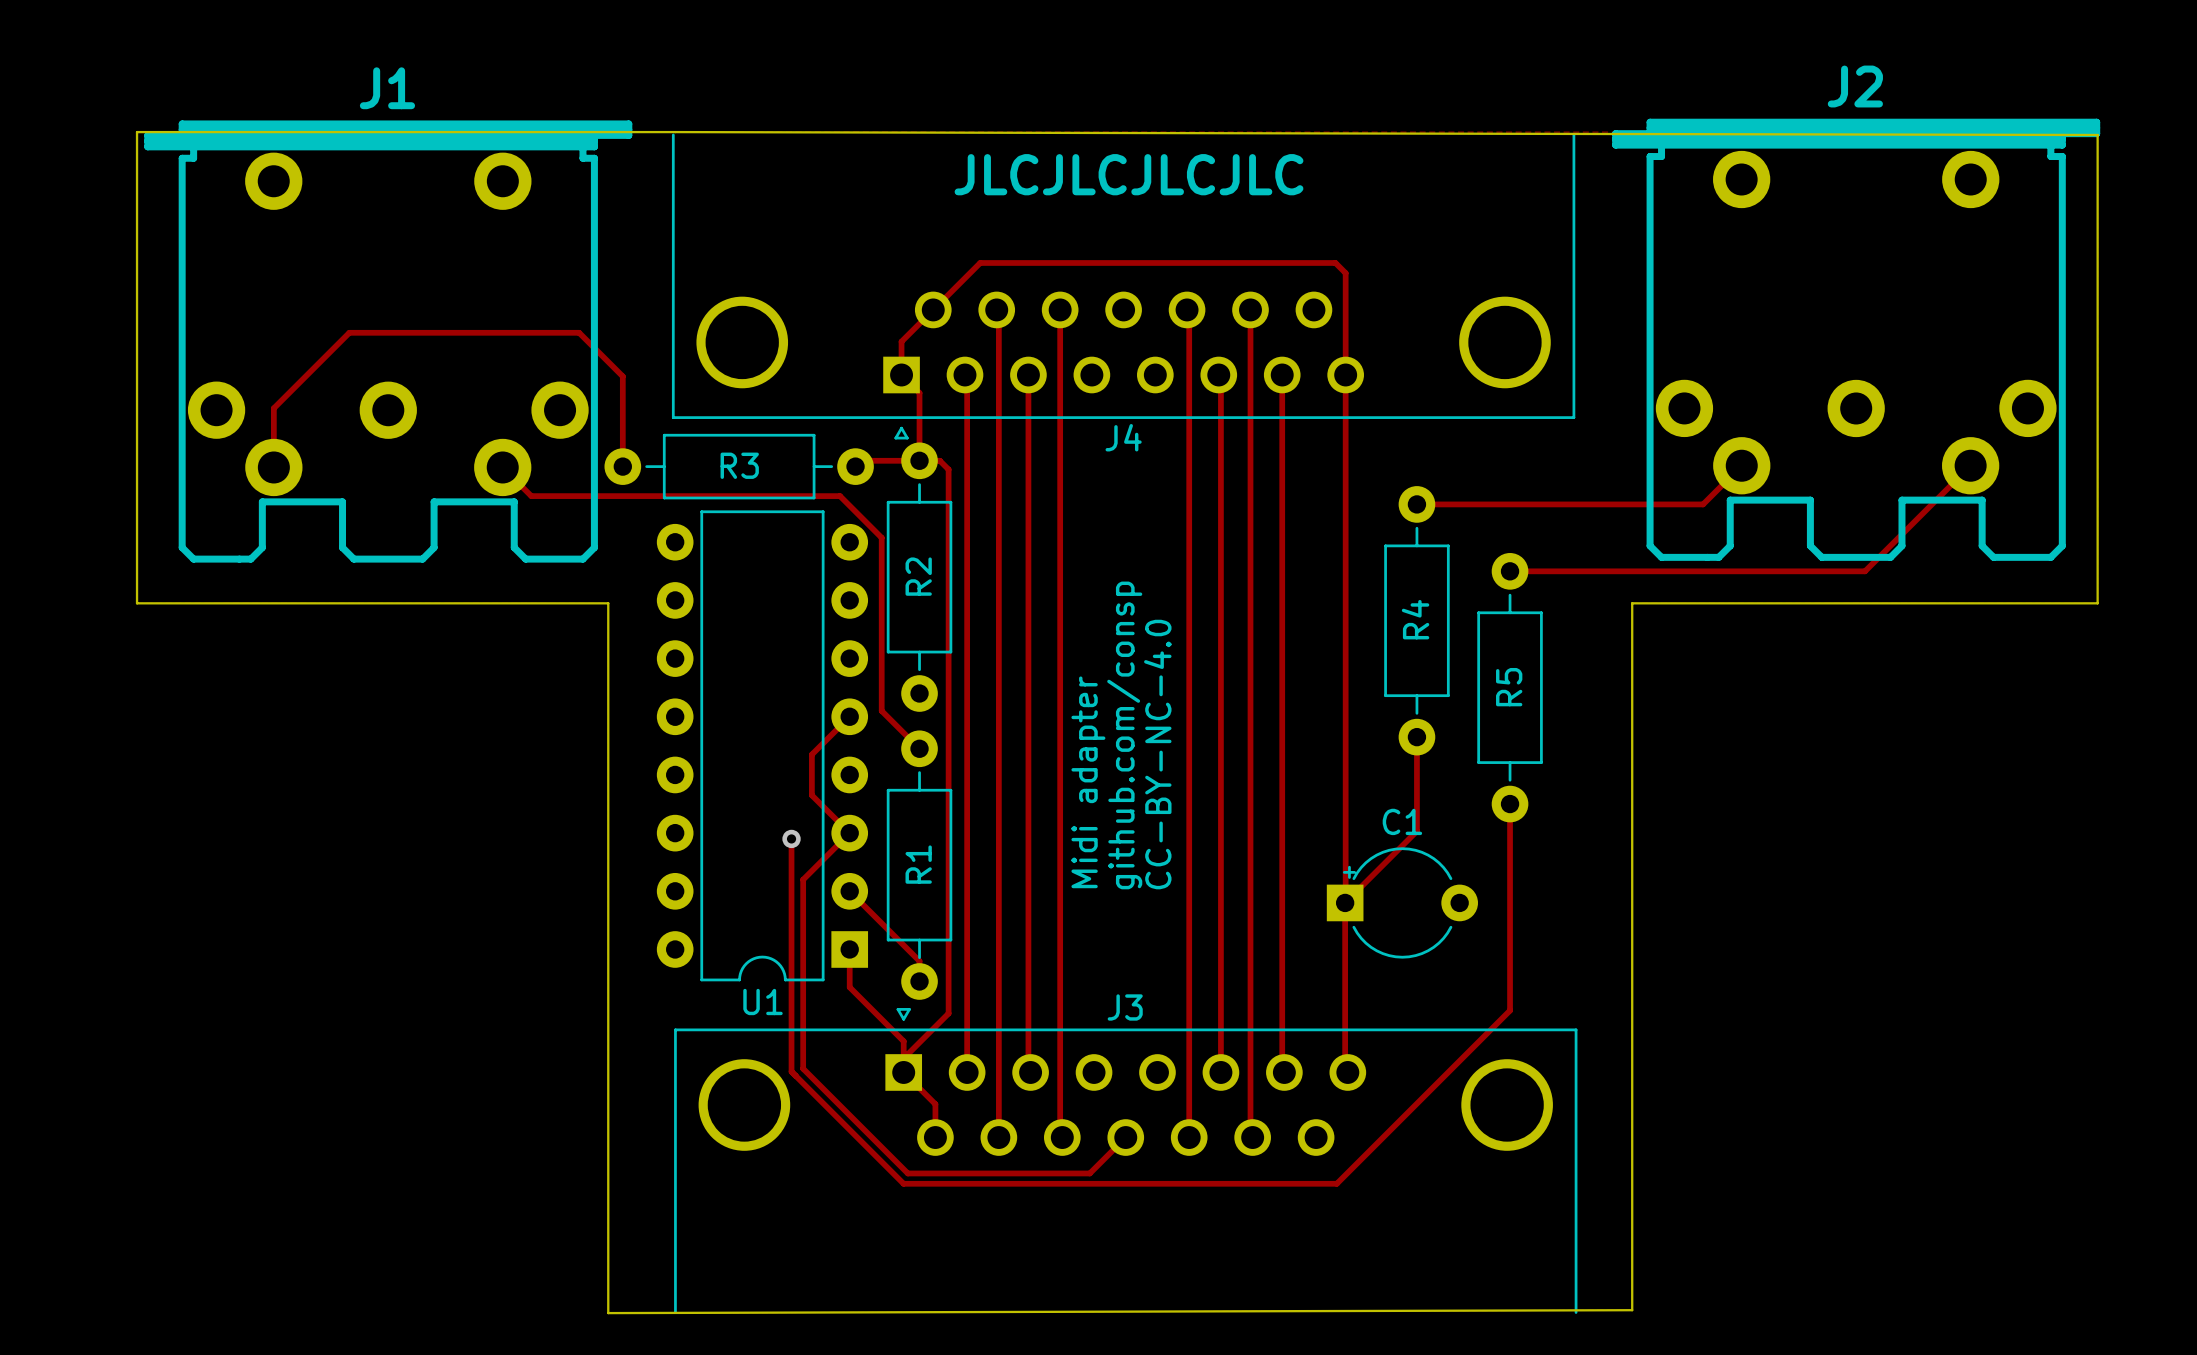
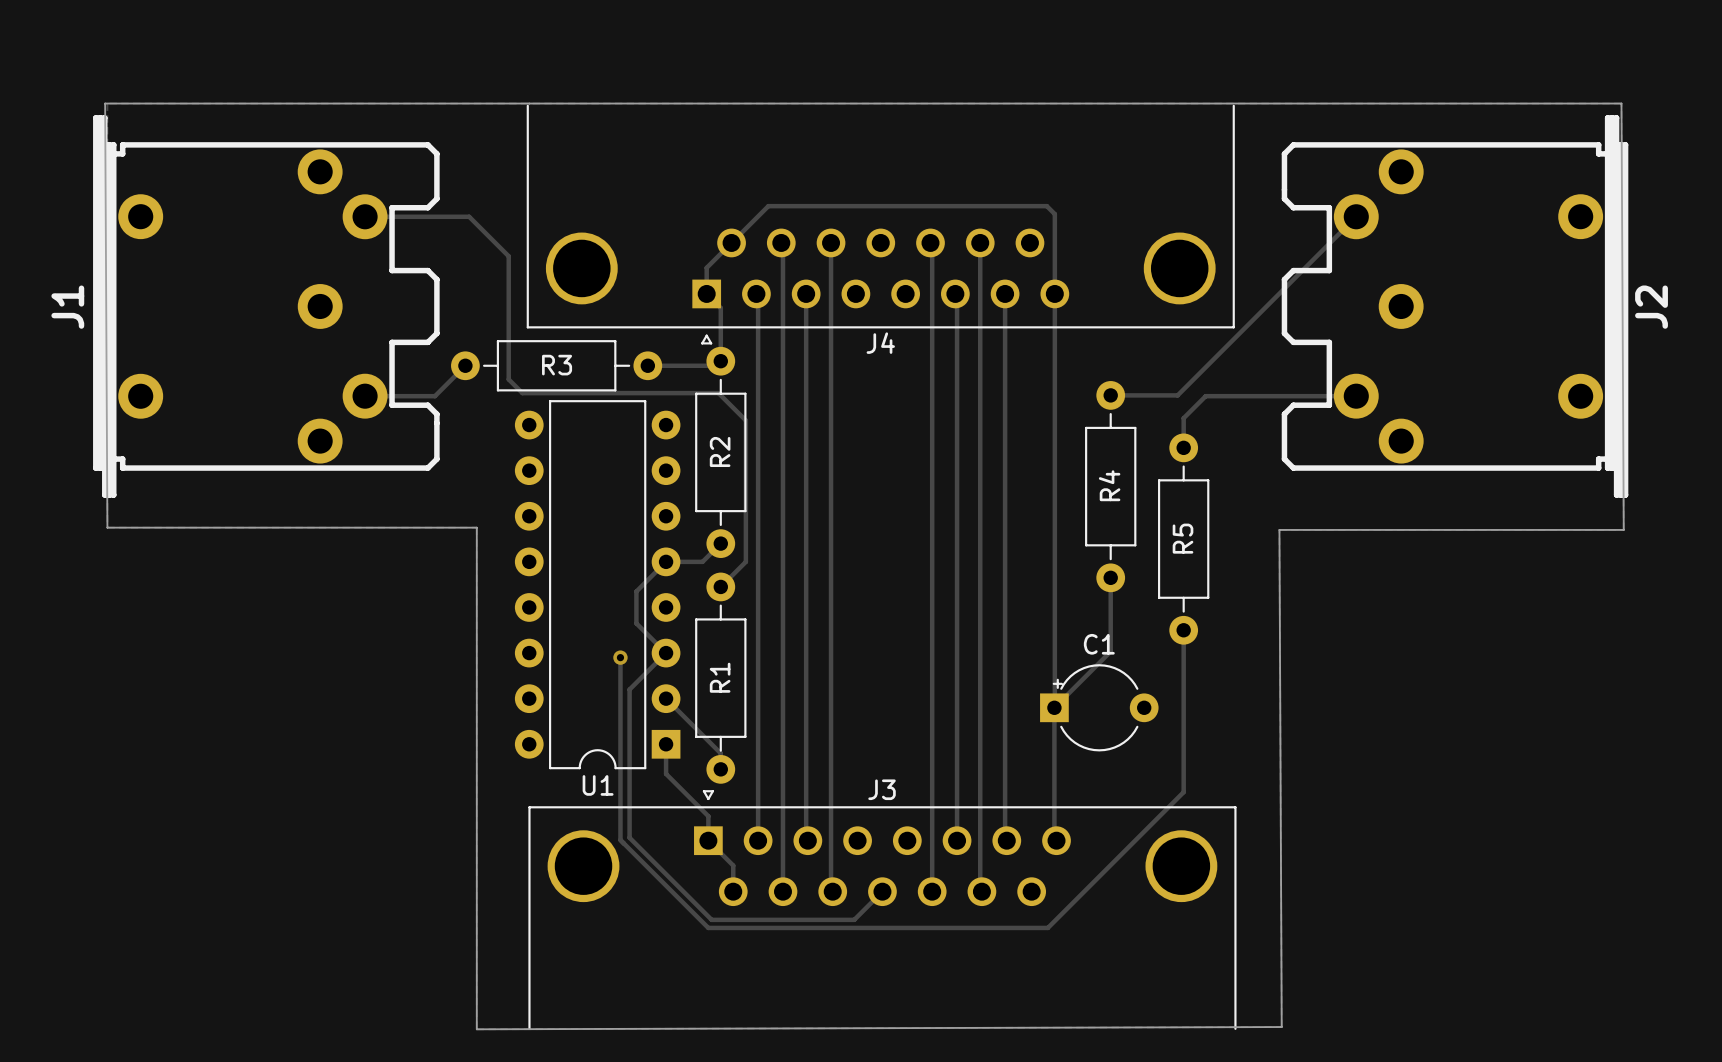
board edge: (137, 132) (137, 603) (608, 603) (608, 673) -> (107, 103) (105, 103) (107, 527) (476, 527)
board edge: (675, 132) (2097, 134) (2097, 603) (1632, 603) (1632, 1310) (608, 1313) -> (529, 103) (1621, 103) (1623, 529) (1279, 529) (1281, 1027) (476, 1029)
text: JLCJLCJLCJLC (1129, 174) -> none
J2 rotation: 0° (1856, 339) -> 90° clockwise (1455, 306)
J1 rotation: 0° (388, 341) -> 90° counterclockwise (266, 306)
track: (1741, 465) (1703, 504) (1502, 504) -> (1356, 216) (1177, 395)
track: (1970, 465) (1865, 571) (1510, 571) -> (1356, 396) (1205, 396) (1183, 418) (1183, 447)
track: none -> (465, 365) (434, 396) (365, 396)
track: (622, 466) (622, 376) (579, 332) (349, 332) (273, 408) (273, 467) -> none
R3 position: (739, 466) -> (556, 365)
track: none -> (647, 365) (716, 365)
track: (855, 466) (861, 460) (939, 460) (948, 469) (948, 1013) (903, 1058) -> none
track: (502, 467) (531, 496) (840, 496) (881, 537) (881, 710) (919, 748) -> (365, 216) (469, 216) (508, 256) (508, 379) (522, 393) (718, 393) (745, 420) (745, 561) (720, 586)
track: none -> (720, 543) (702, 561) (666, 561)
text: github.com/consp (1124, 735) -> none
text: CC-BY-NC-4.0 (1157, 754) -> none
text: Midi adapter (1088, 782) -> none

